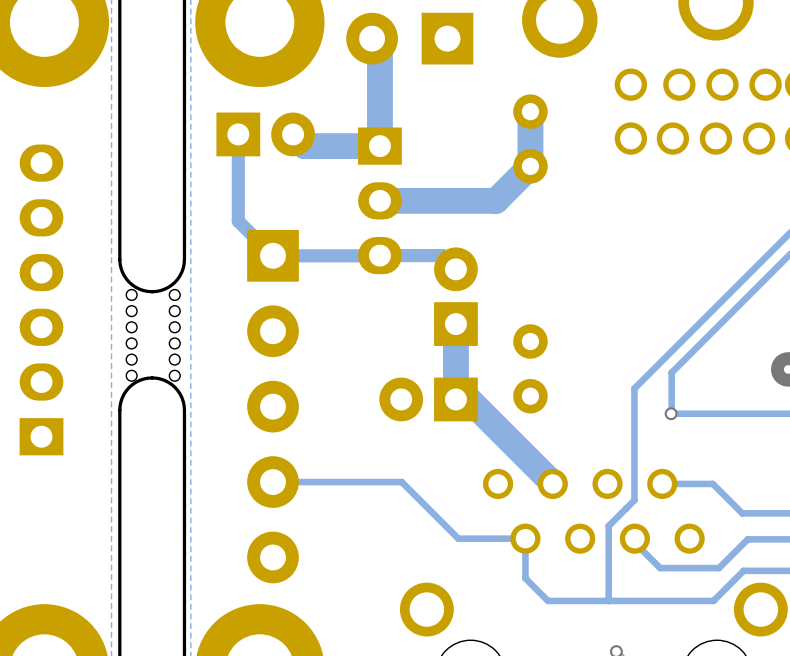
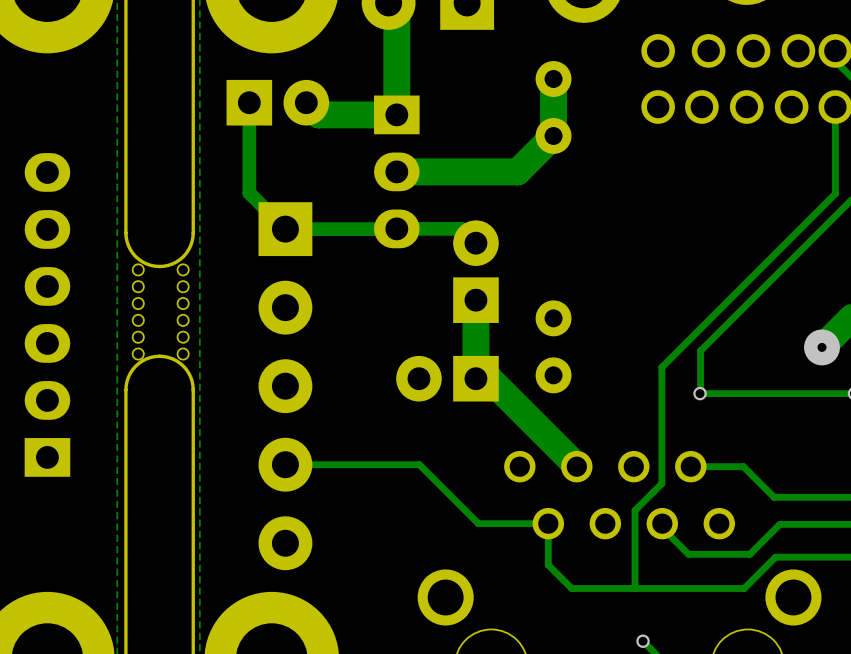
part position: (41, 299) -> (47, 314)

